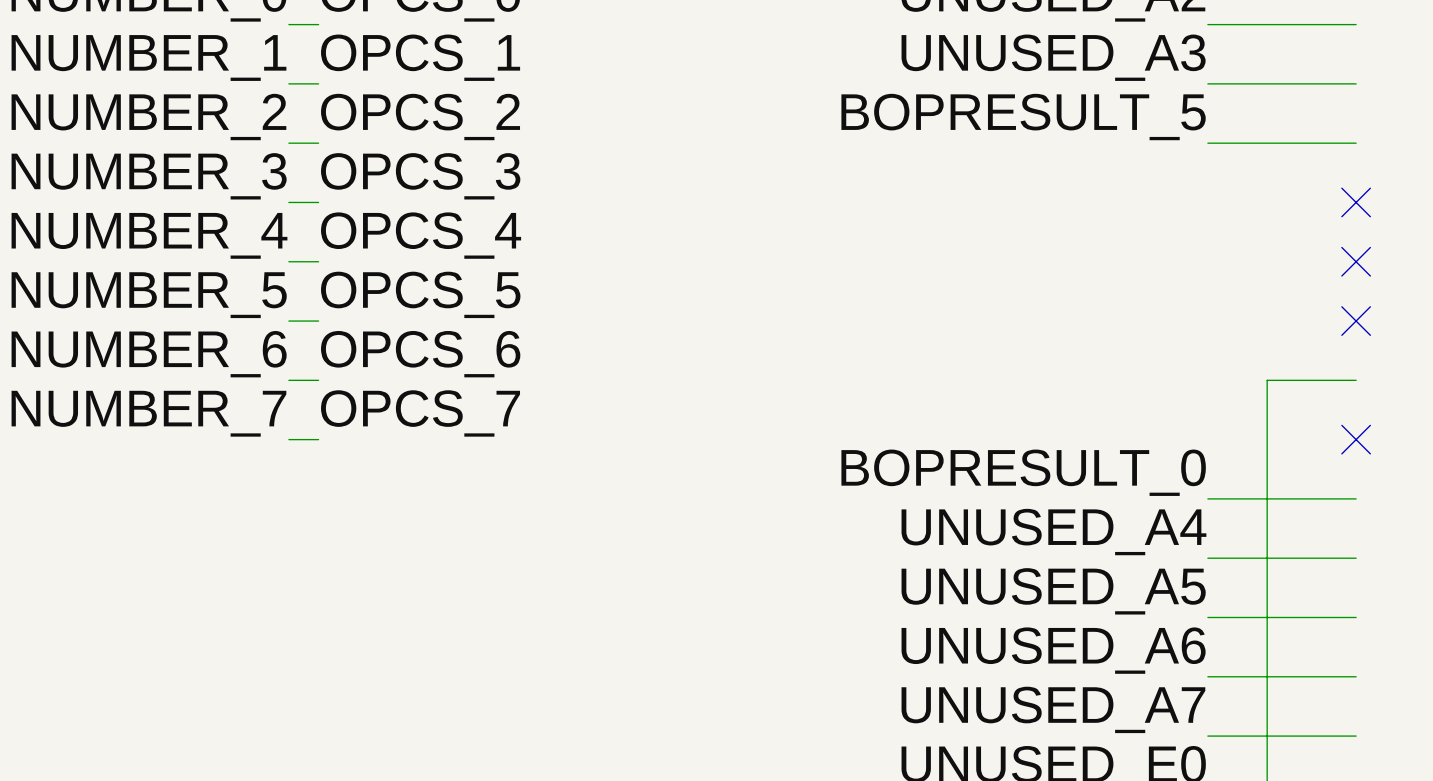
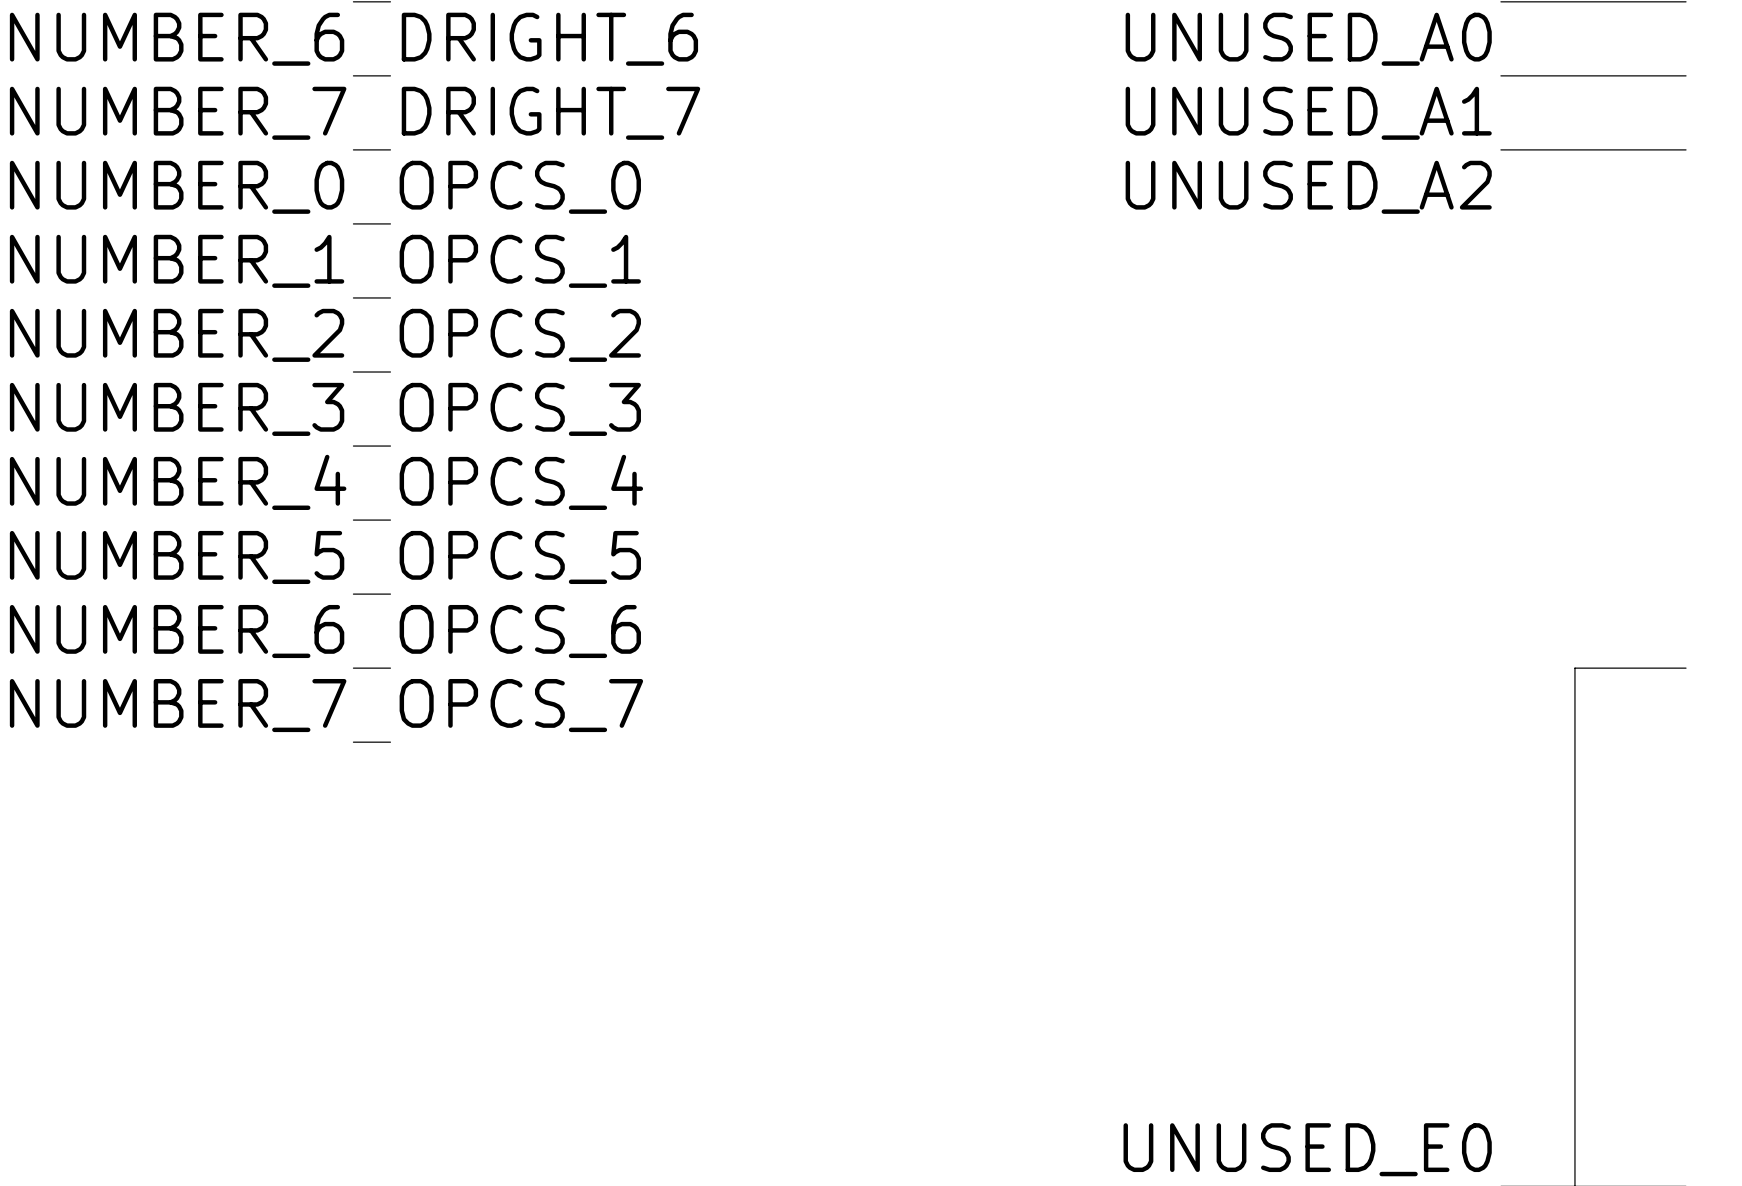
wire: (1207, 24) (1356, 24) -> none
label: UNUSED_A3 (1053, 57) -> none
wire: (1207, 83) (1356, 83) -> none
label: BOPRESULT_5 (1023, 117) -> none
wire: (1207, 143) (1356, 143) -> none
no-connect mark: (1356, 202) -> none
no-connect mark: (1356, 261) -> none
no-connect mark: (1356, 321) -> none
no-connect mark: (1356, 439) -> none
label: BOPRESULT_0 (1023, 472) -> none
wire: (1207, 498) (1356, 498) -> none
label: UNUSED_A4 (1053, 532) -> none
wire: (1207, 558) (1356, 558) -> none
label: UNUSED_A5 (1053, 591) -> none
wire: (1207, 617) (1356, 617) -> none
label: UNUSED_A6 (1053, 650) -> none
wire: (1207, 676) (1356, 676) -> none
label: UNUSED_A7 (1053, 709) -> none
wire: (1207, 736) (1356, 736) -> none

